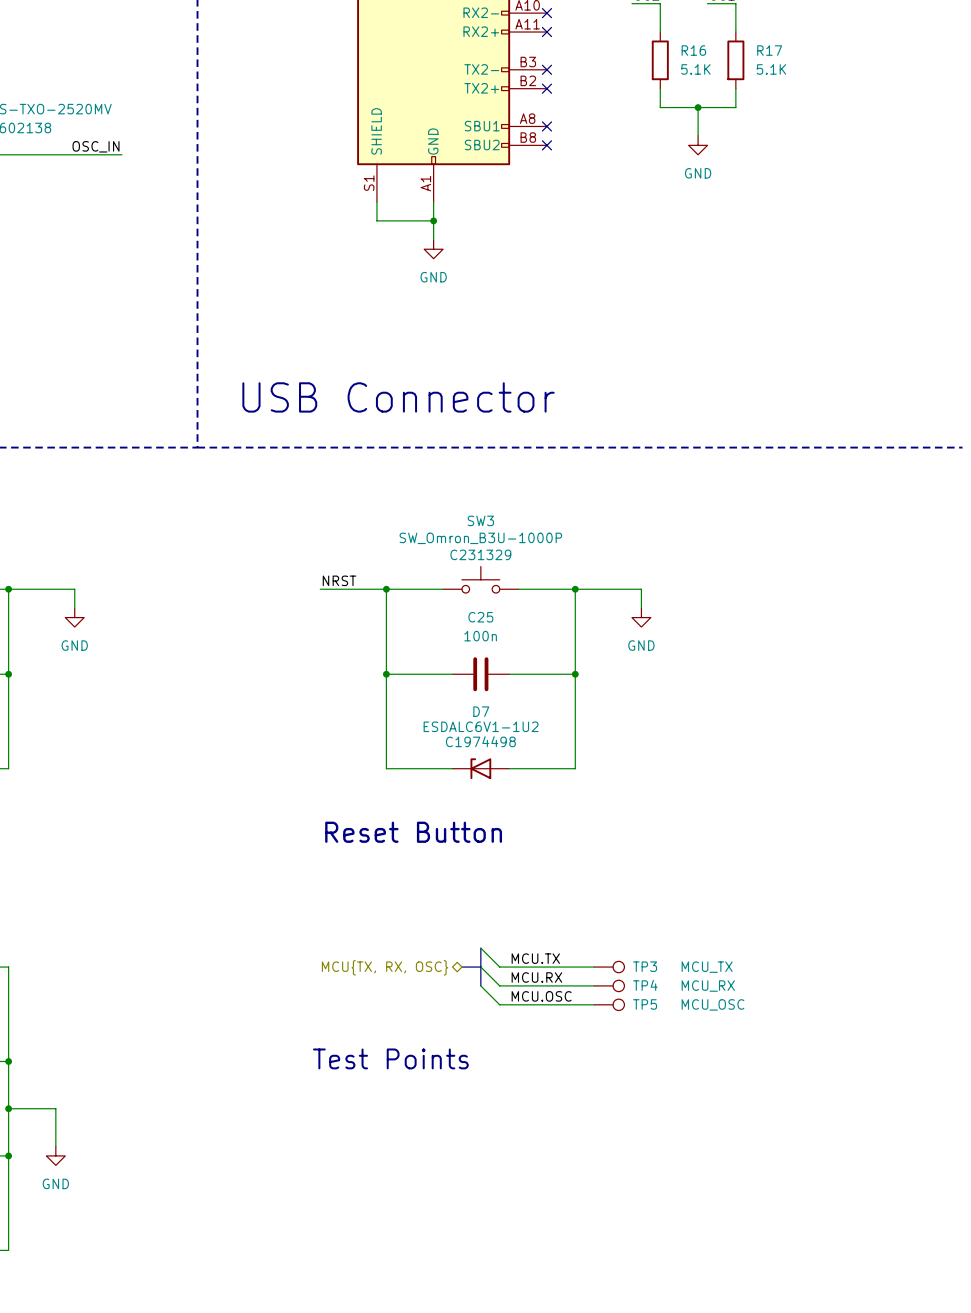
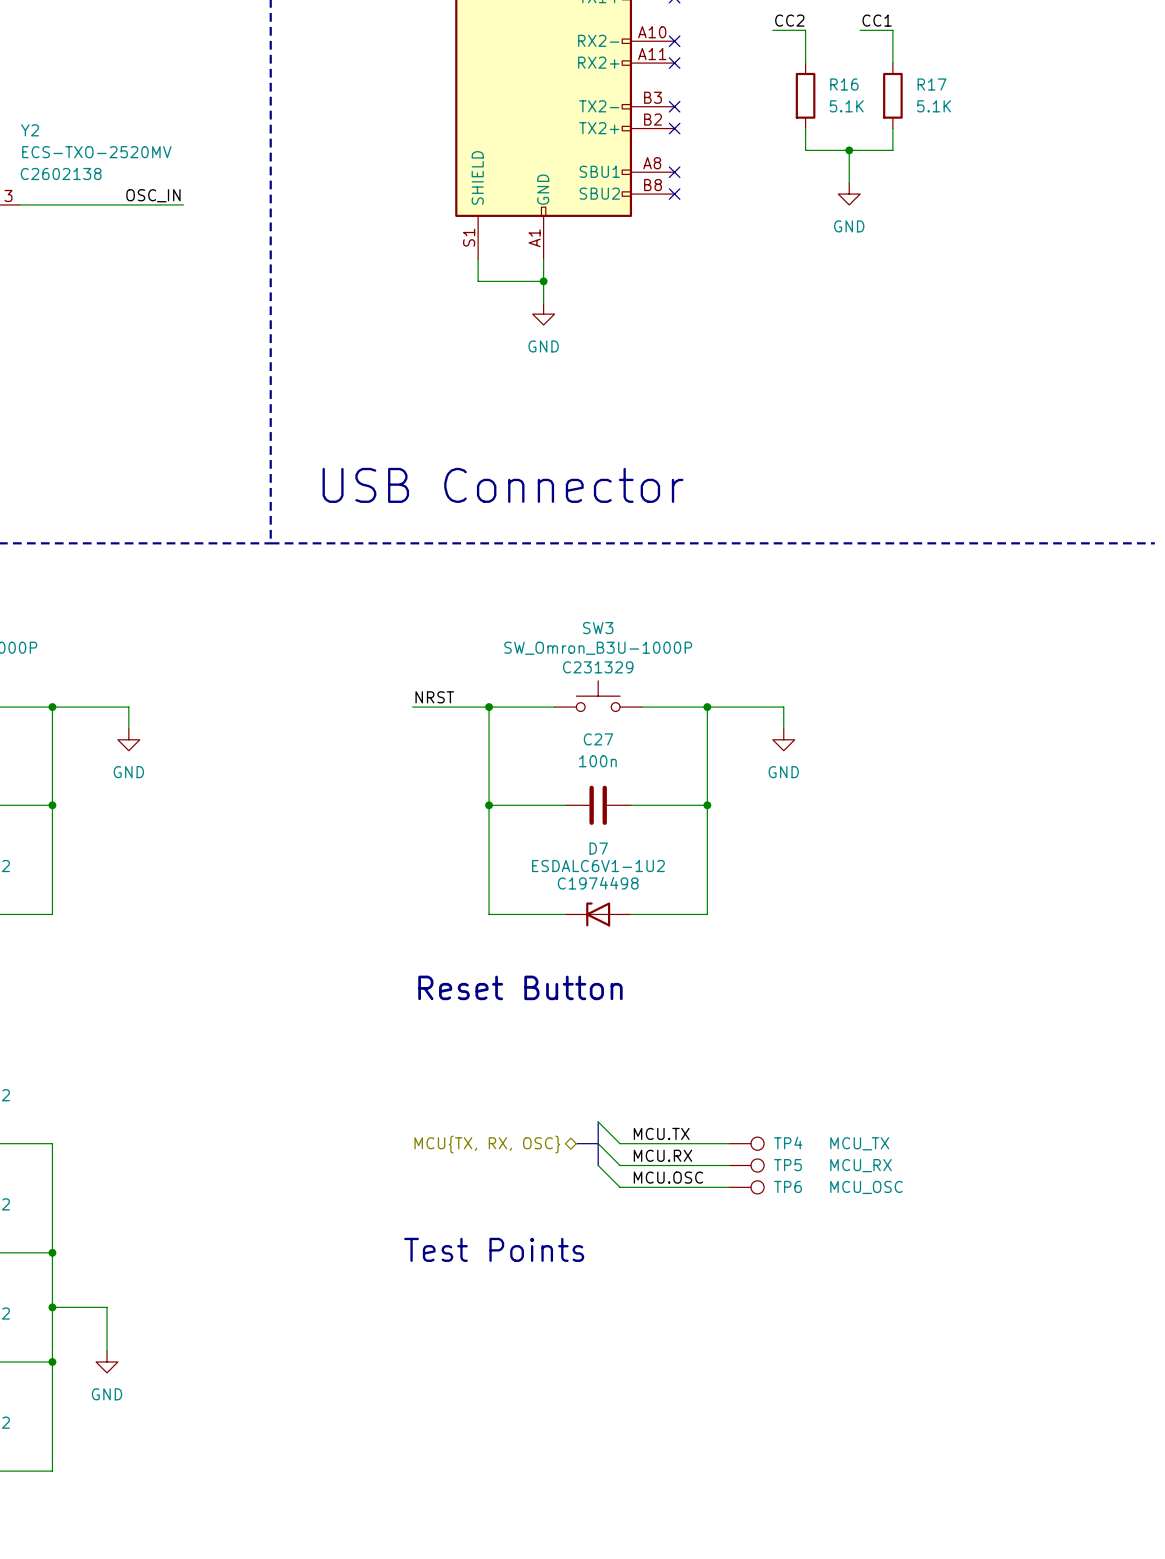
C25 name: C25 (480, 617) -> C27 (598, 739)
TP3 name: TP3 (645, 966) -> TP4 (788, 1143)
TP4 name: TP4 (645, 985) -> TP5 (787, 1165)
TP5 name: TP5 (645, 1004) -> TP6 (787, 1186)

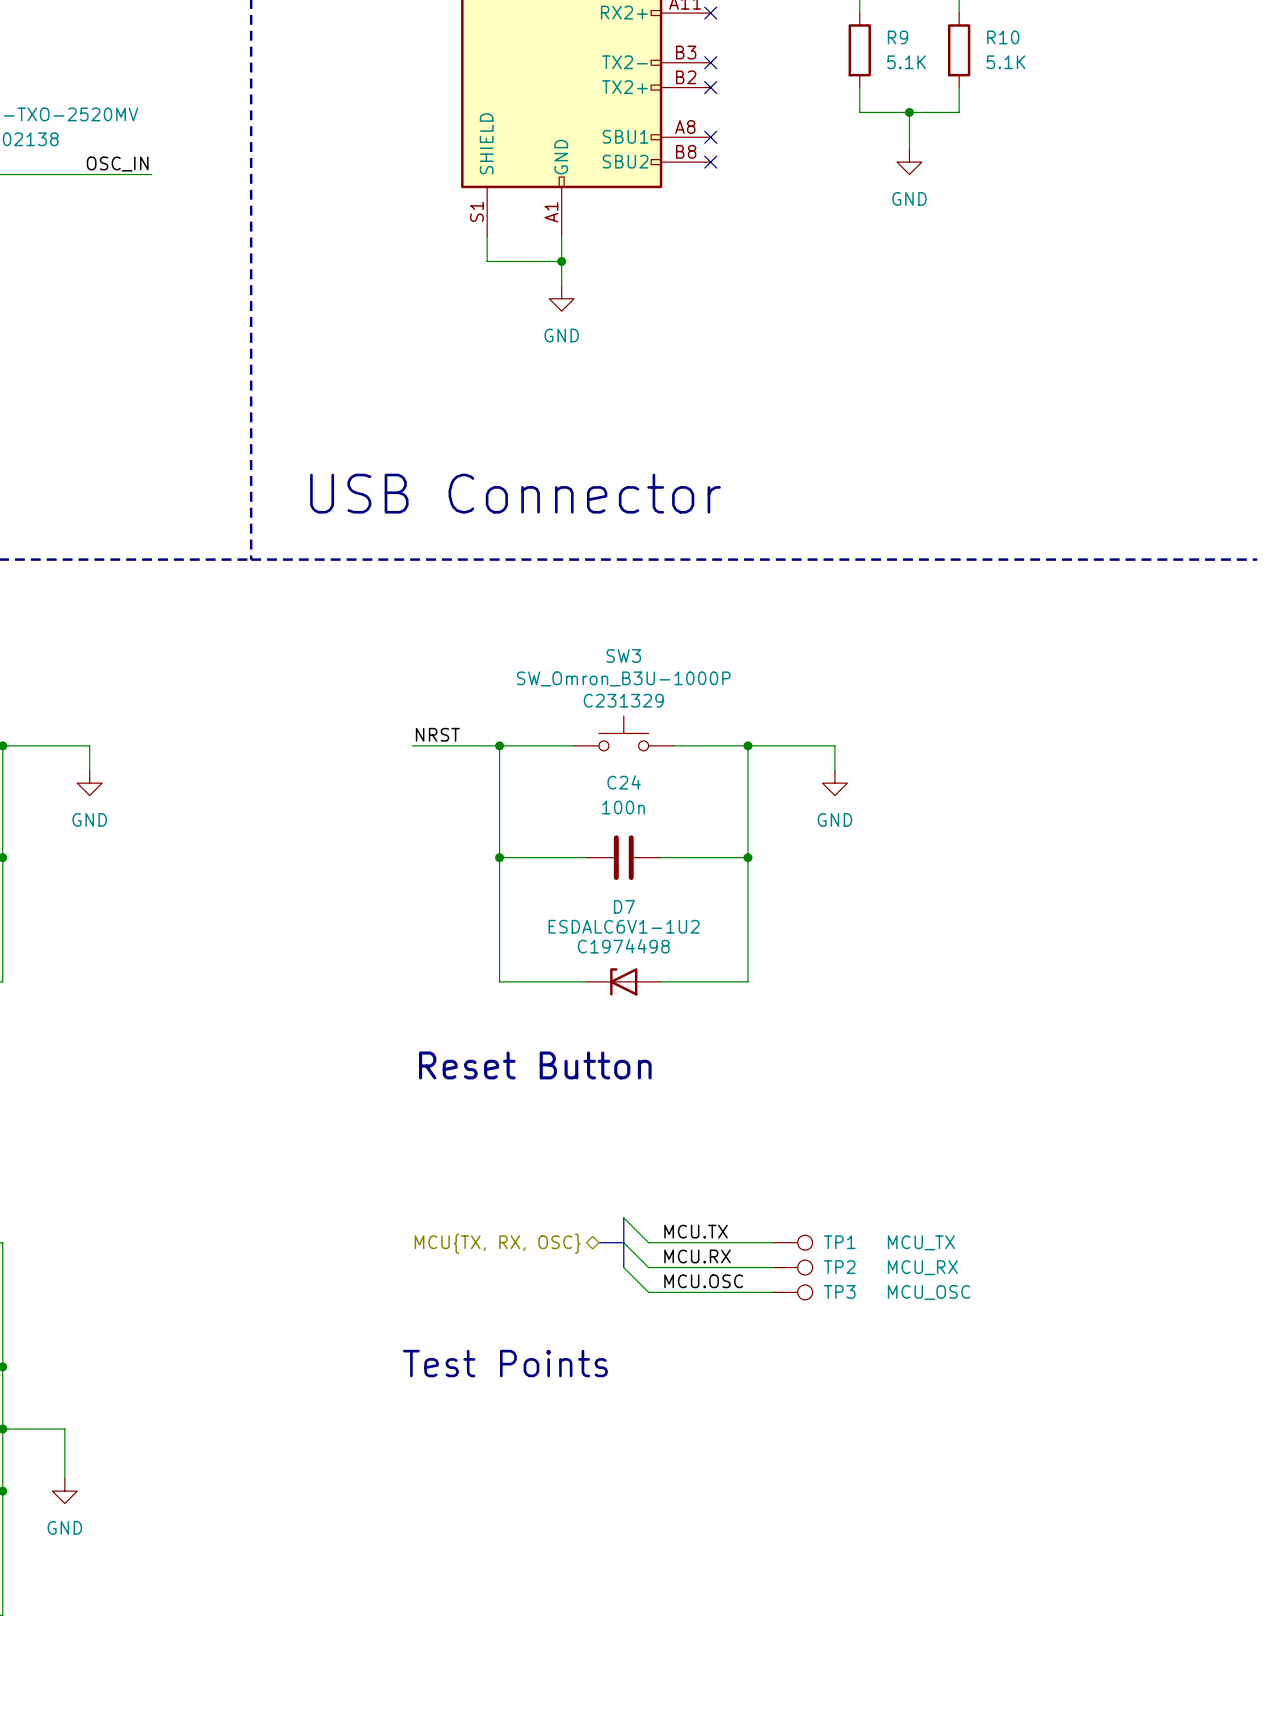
R16 name: R16 (844, 84) -> R9 (898, 37)
R17 name: R17 (931, 84) -> R10 (1003, 37)
C27 name: C27 (598, 739) -> C24 (624, 782)
TP4 name: TP4 (788, 1143) -> TP1 (839, 1242)
TP5 name: TP5 (787, 1165) -> TP2 (839, 1267)
TP6 name: TP6 (787, 1186) -> TP3 (839, 1291)

